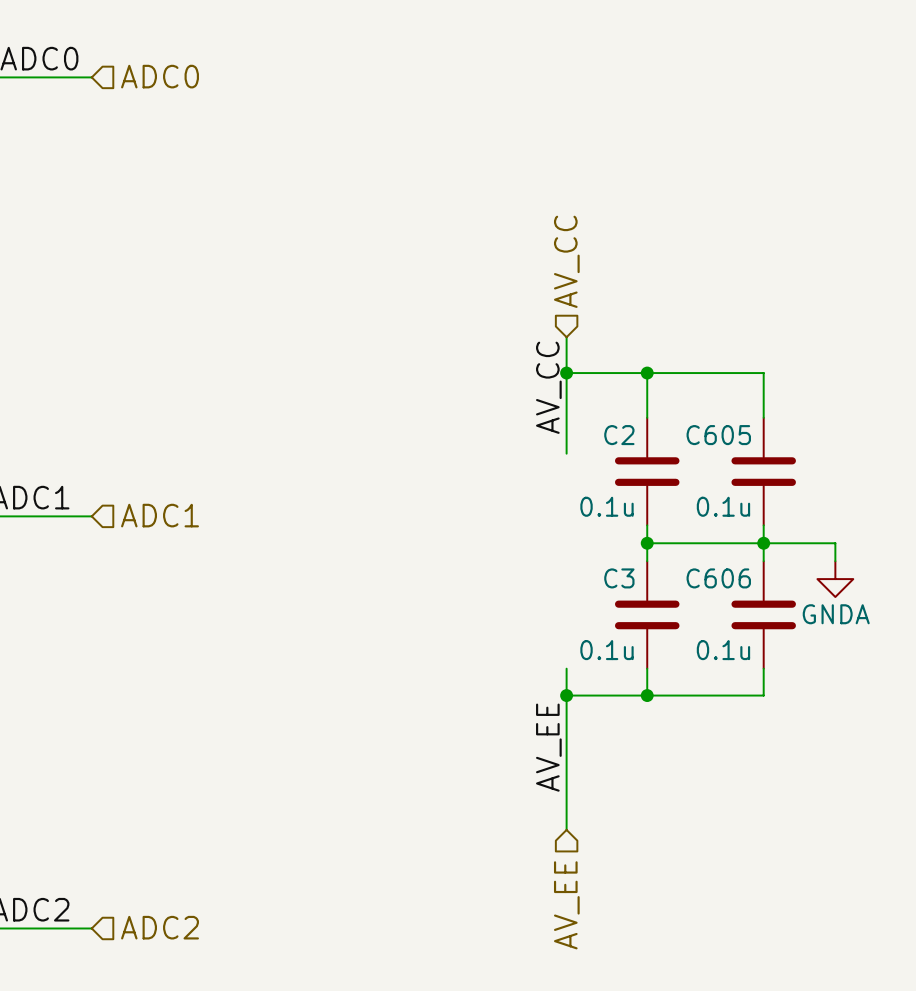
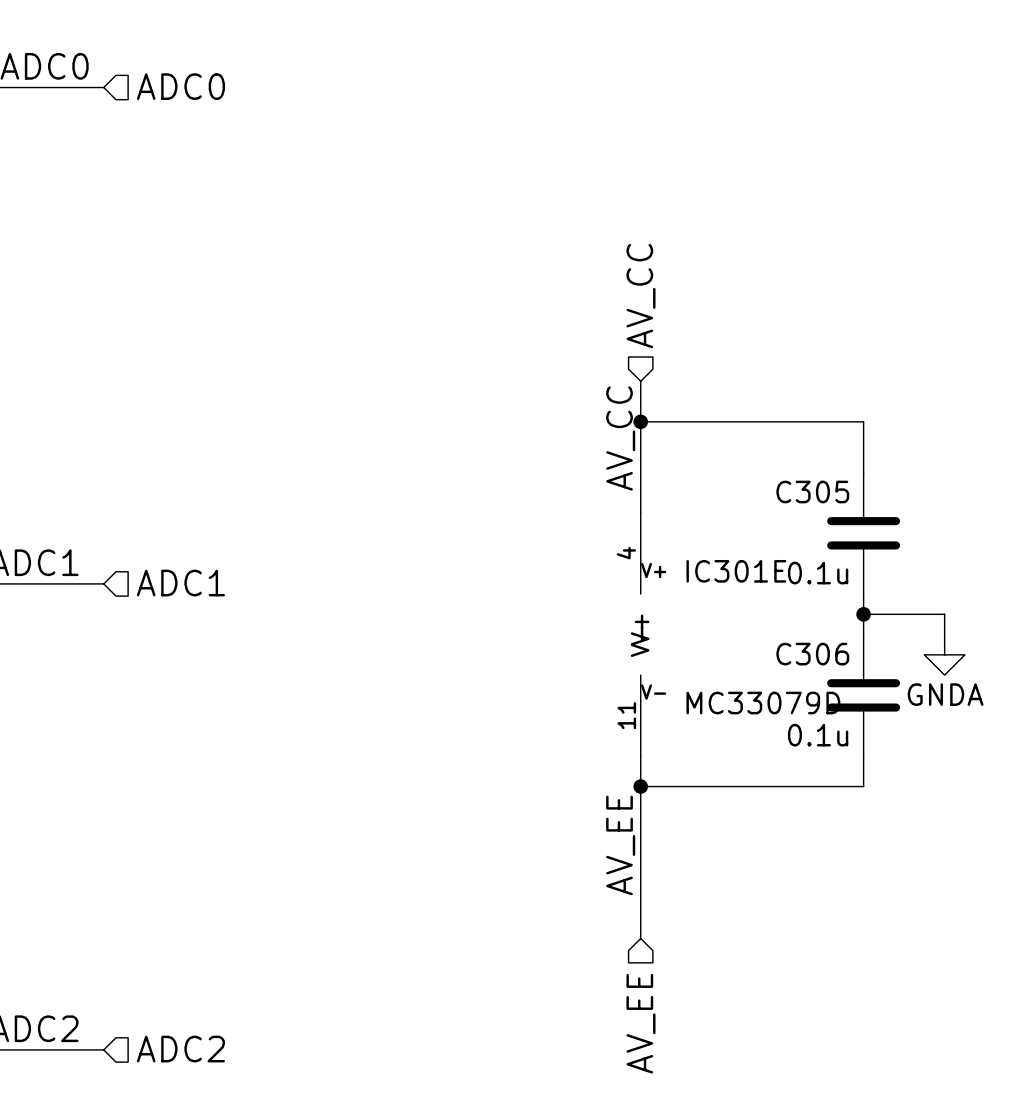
wire: (647, 373) (647, 417) -> none
junction: (647, 373) -> none
C605 name: C605 (718, 435) -> C305 (812, 492)
C2: 0.1u (647, 471) -> none
wire: (647, 525) (647, 561) -> none
wire: (647, 543) (763, 543) -> none
junction: (647, 543) -> none
IC301E: none -> MC33079D (640, 634)
C606 name: C606 (718, 578) -> C306 (812, 654)
C3: 0.1u (647, 614) -> none
wire: (647, 668) (647, 695) -> none
junction: (647, 695) -> none

